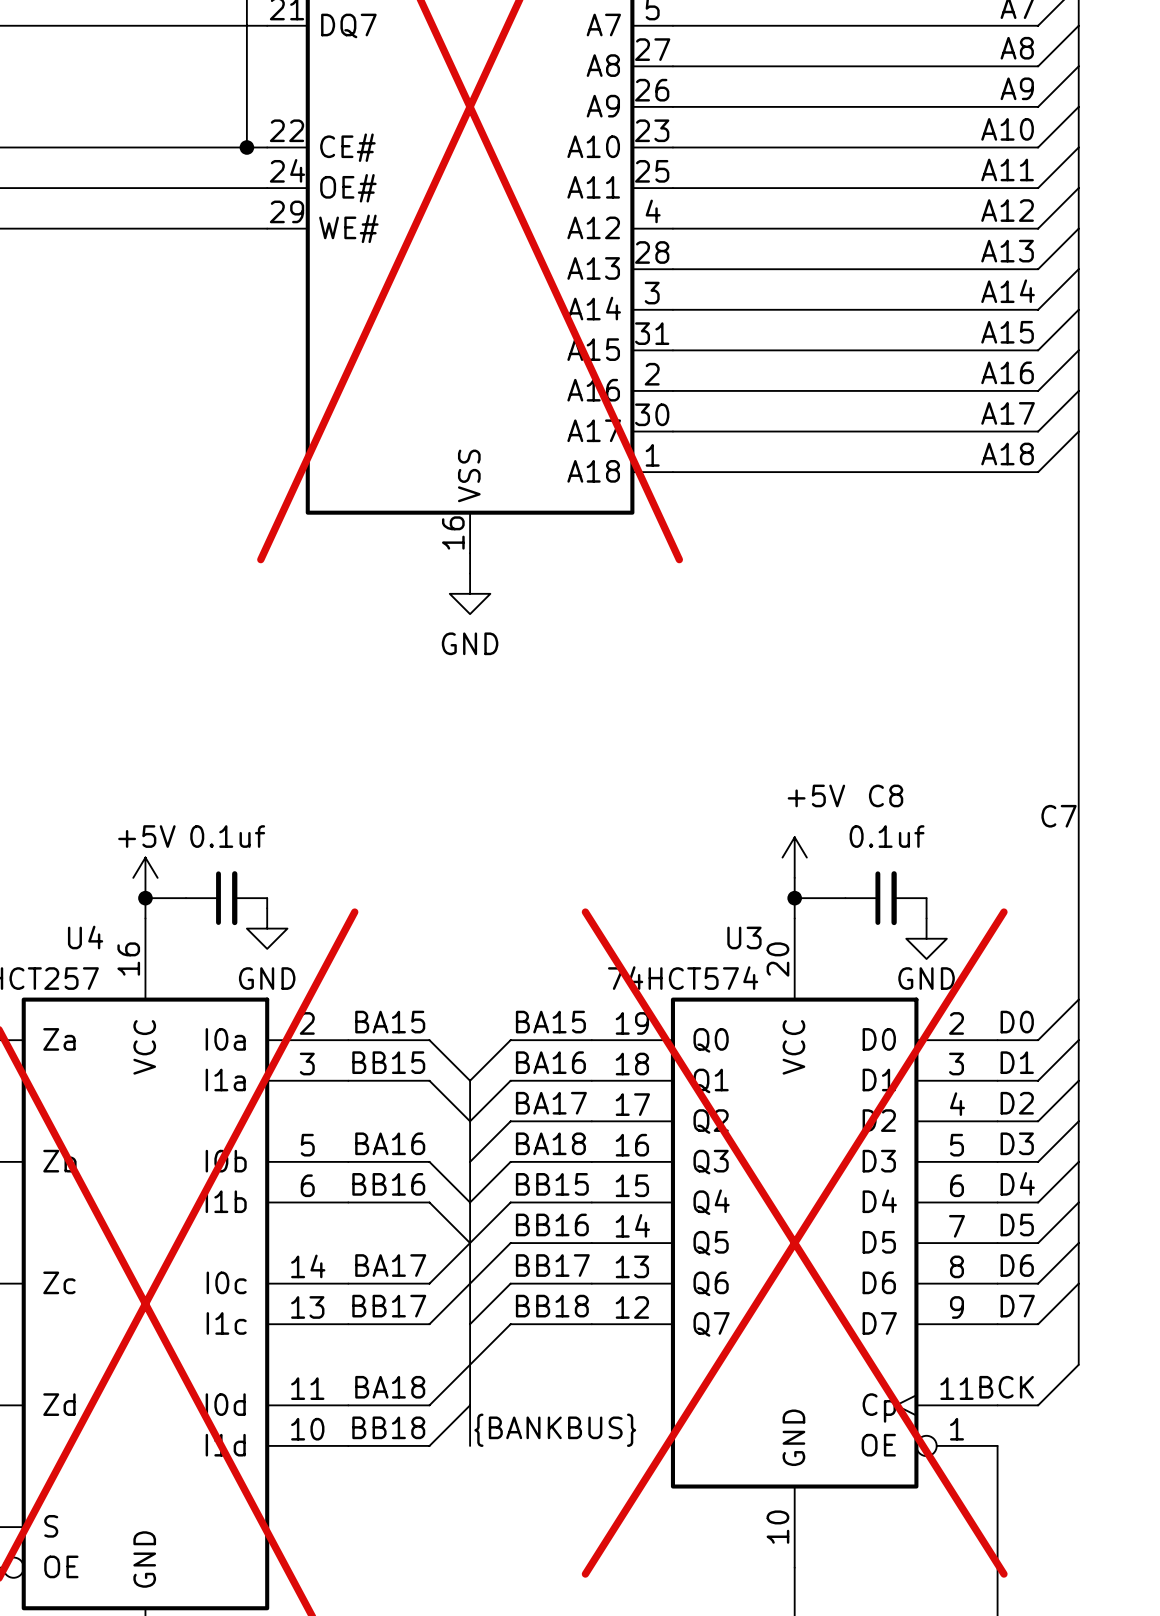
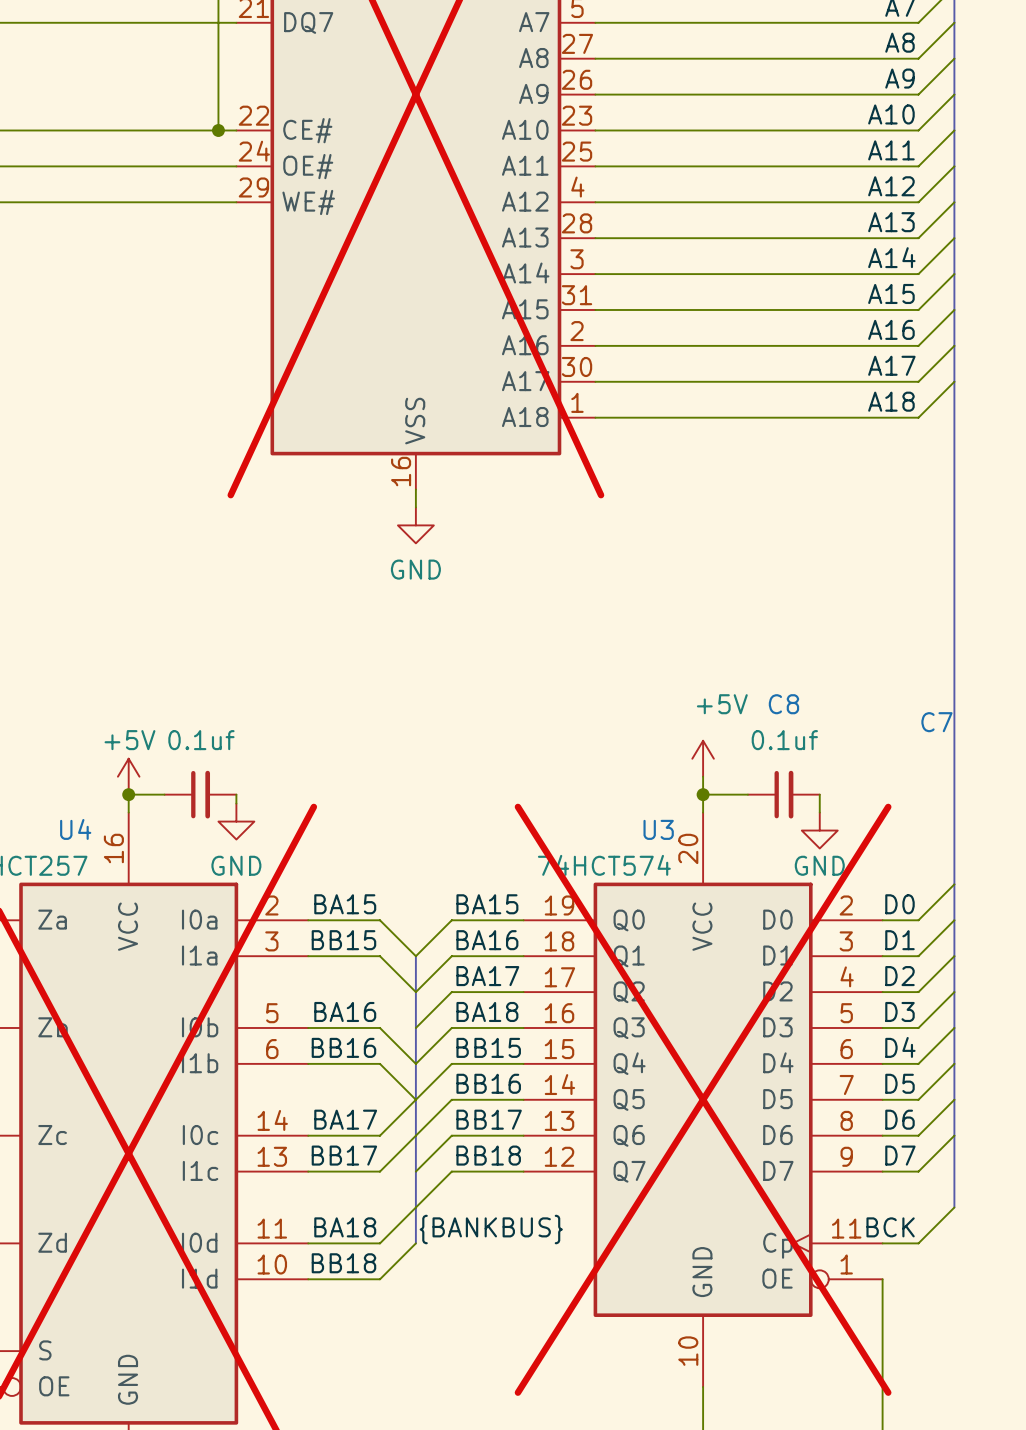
bus: (470, 1405) (470, 1445) -> none
label position: {BANKBUS} (555, 1430) -> {BANKBUS} (491, 1229)

